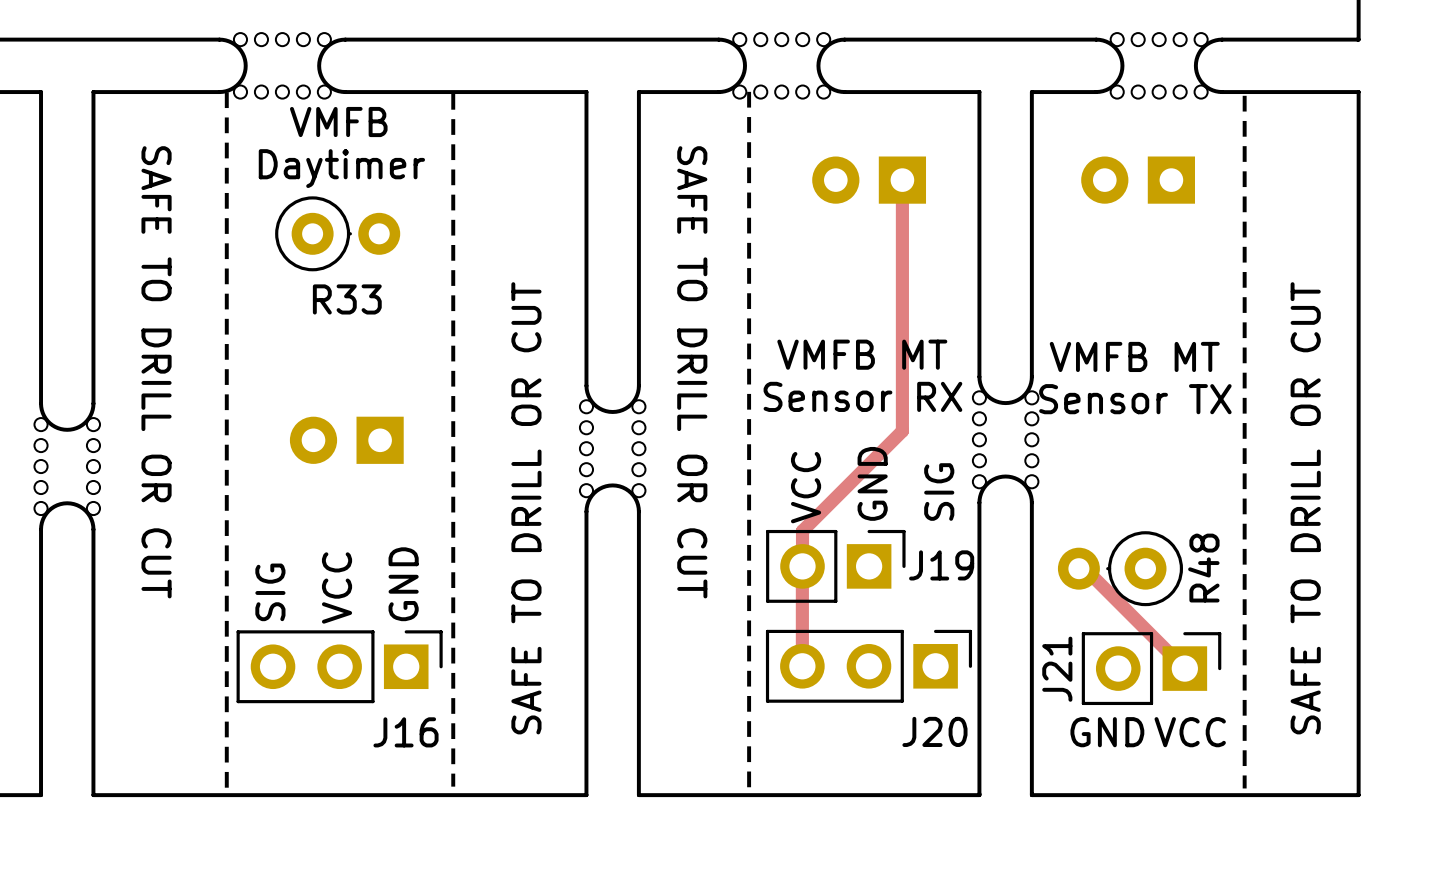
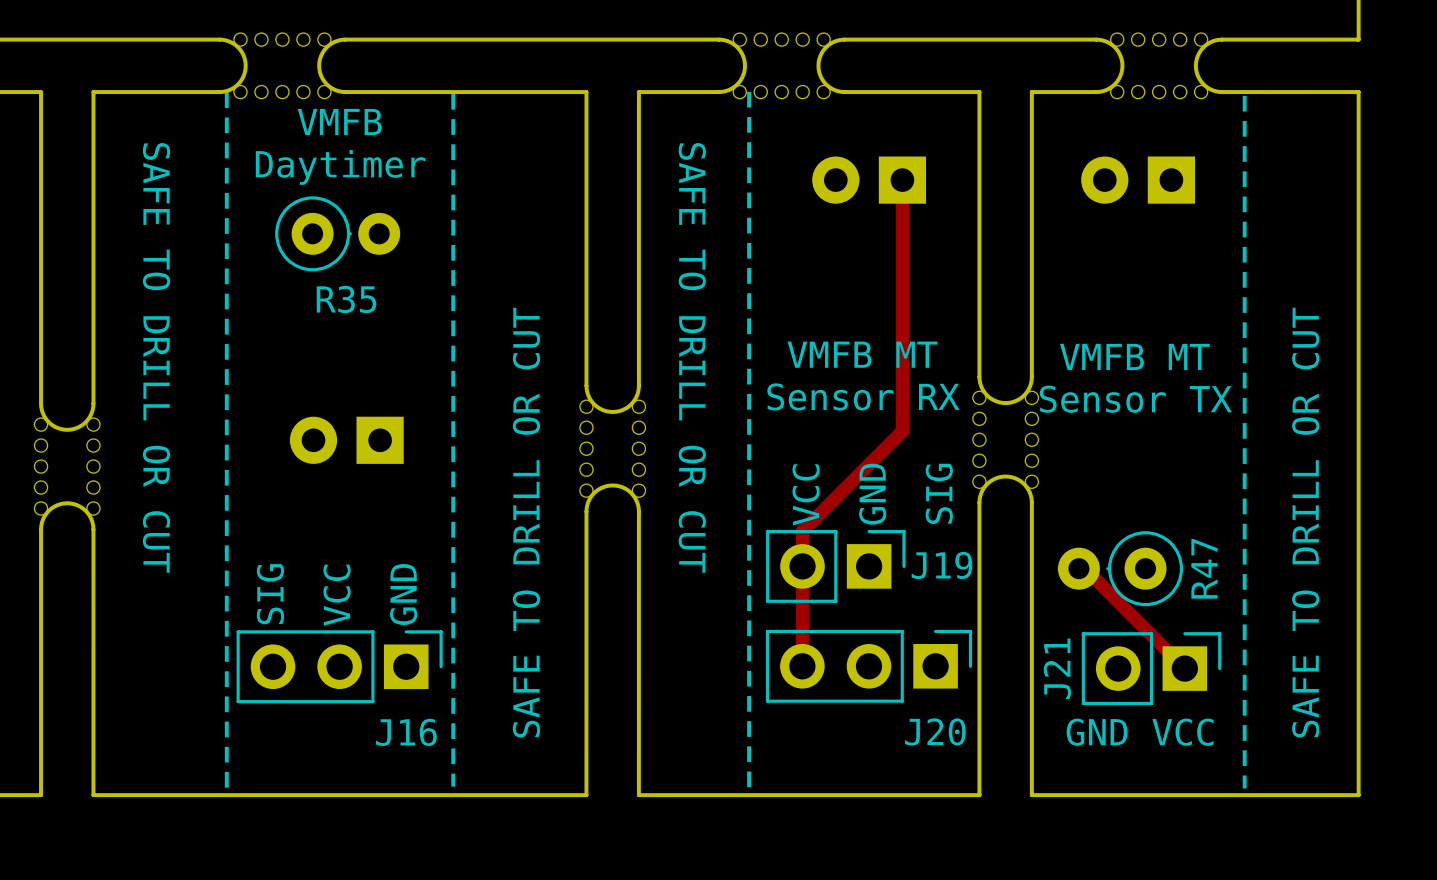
R33 name: R33 (347, 299) -> R35 (346, 299)
R48 name: R48 (1203, 568) -> R47 (1204, 568)

